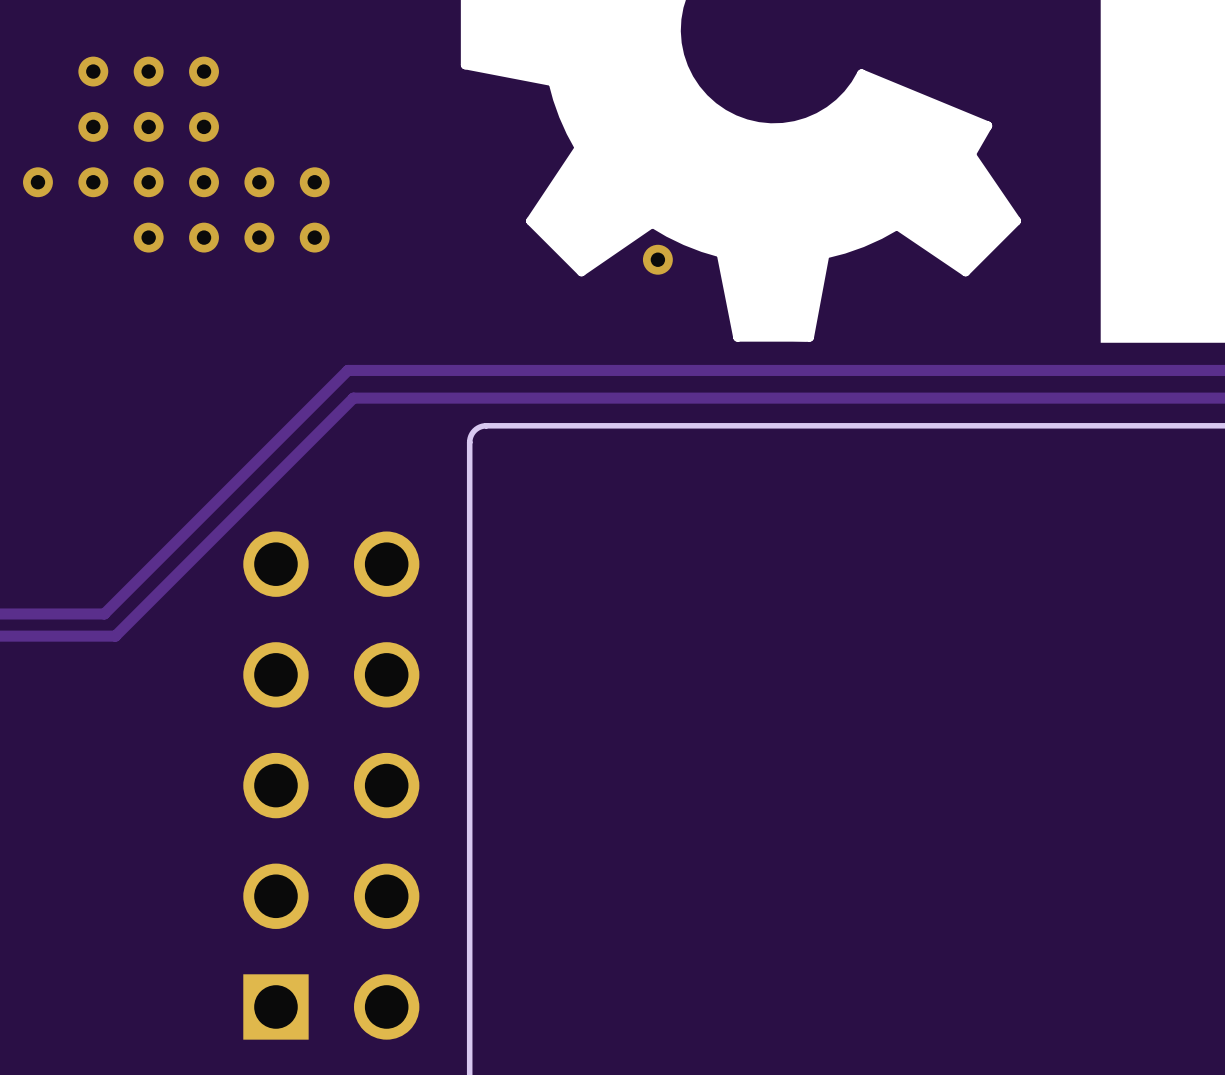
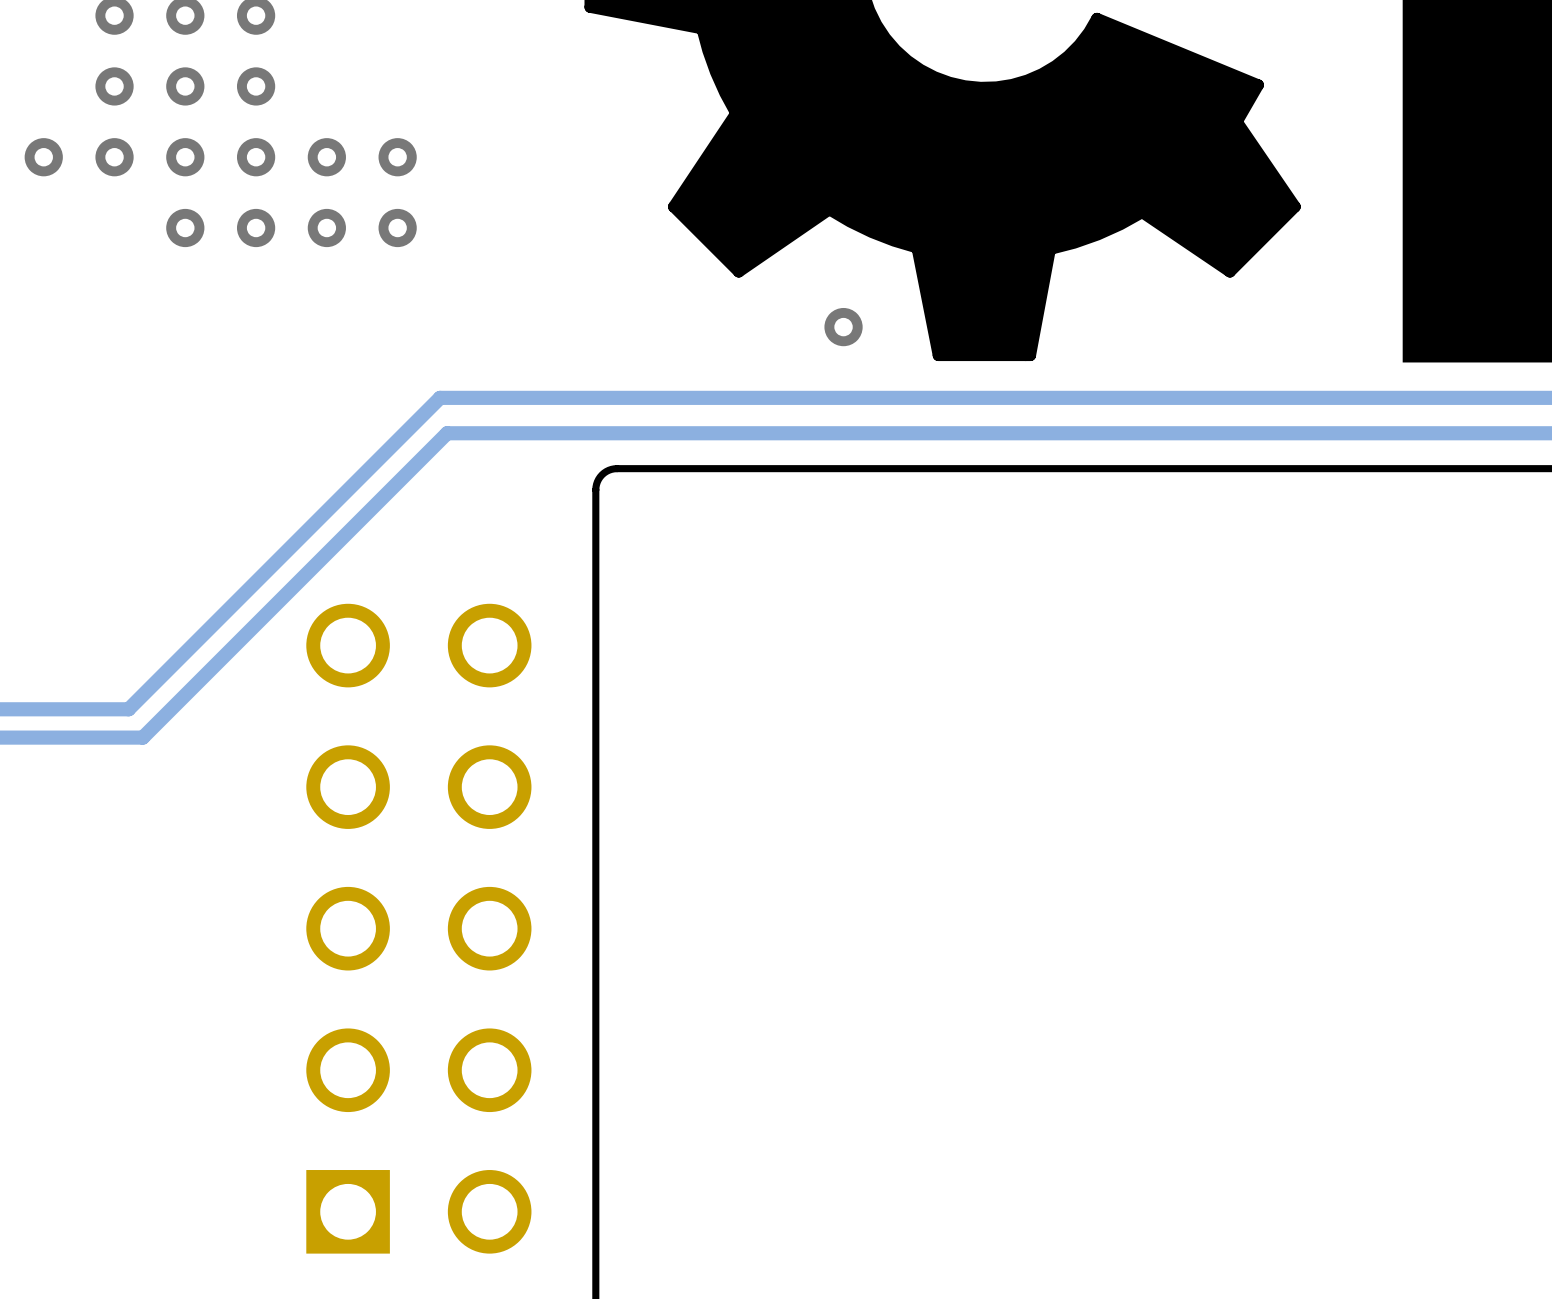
via: (657, 259) -> none
via: none -> (843, 327)

